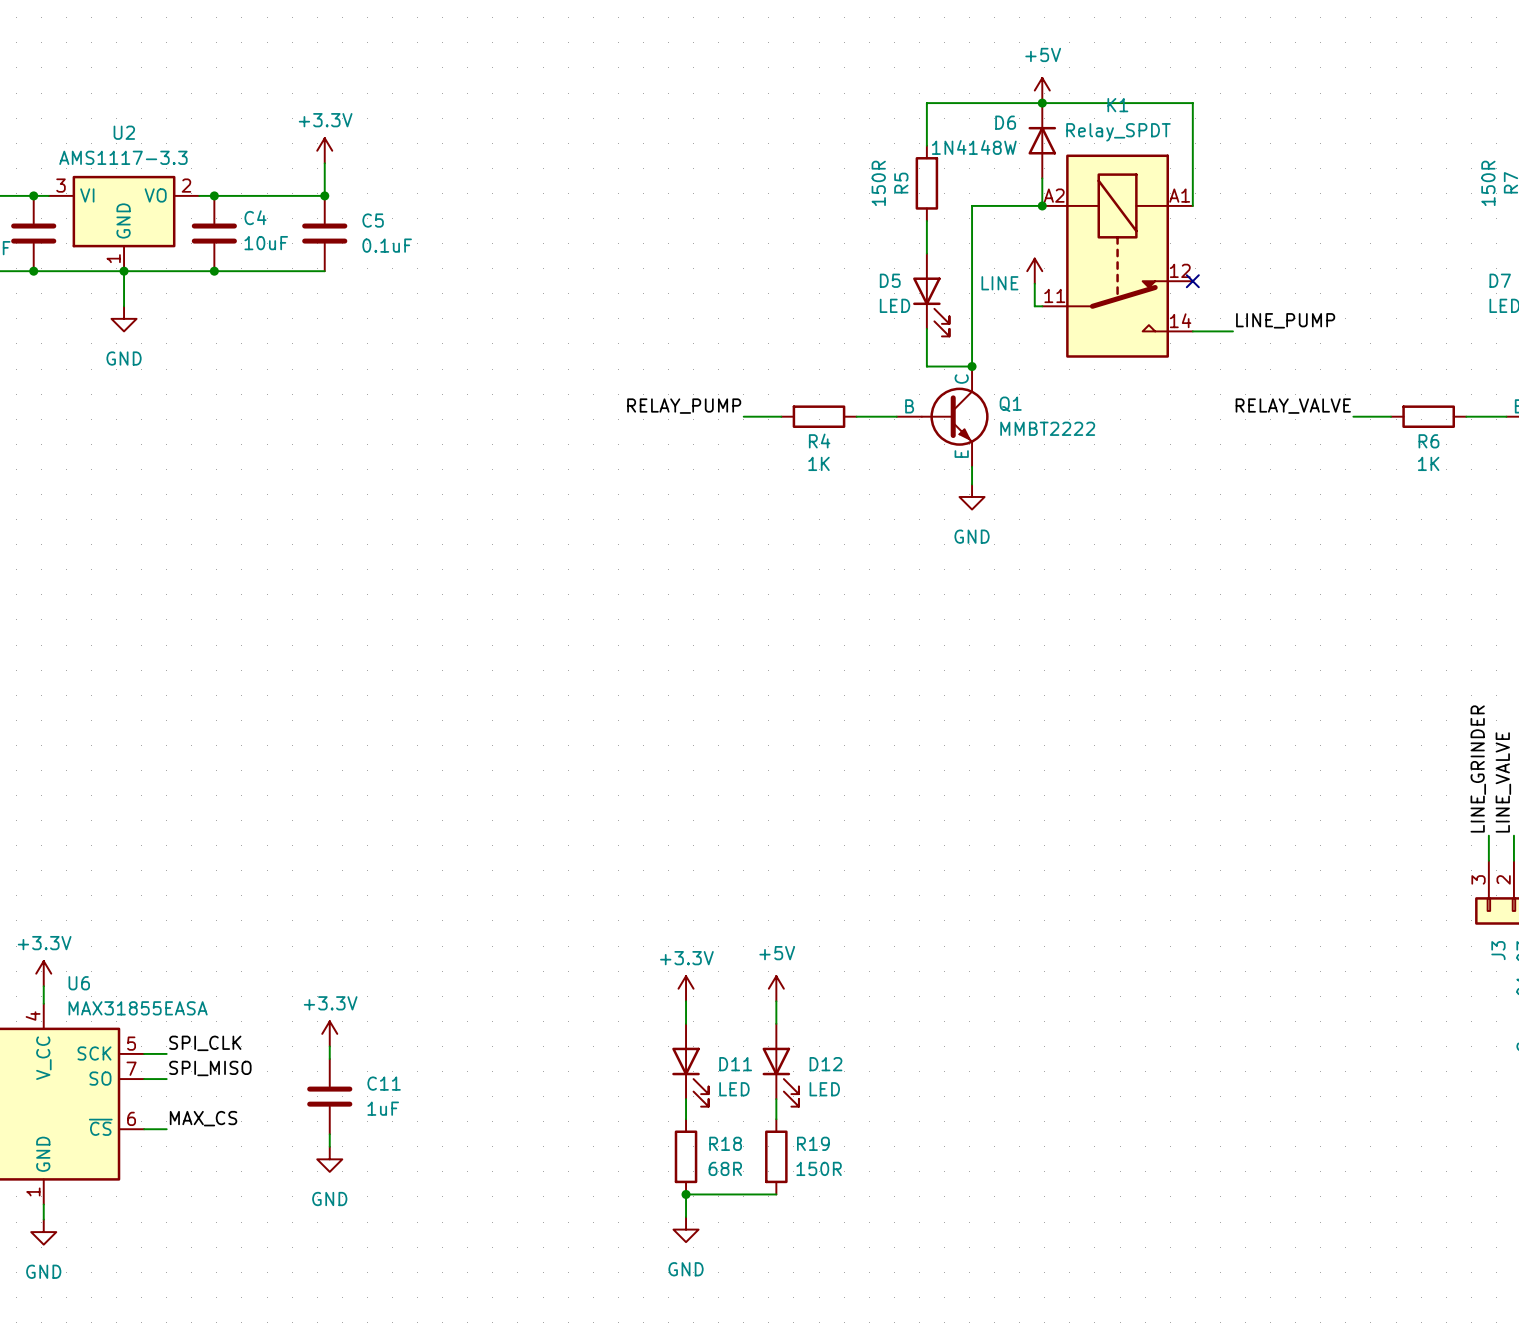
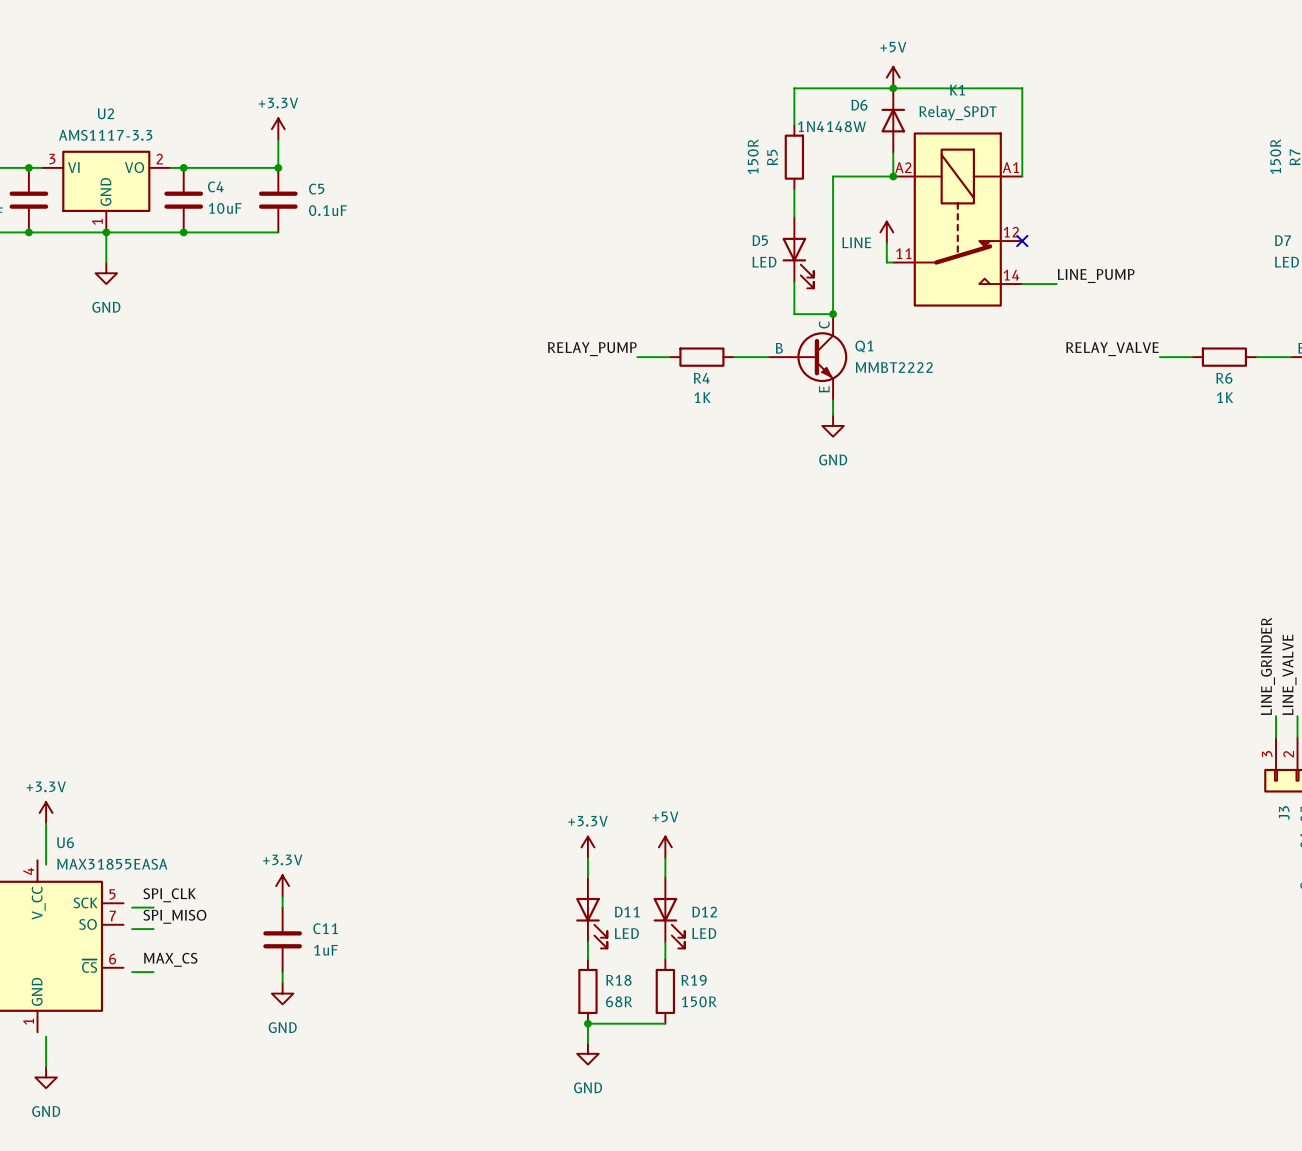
wire: none -> (46, 823) (46, 864)
power symbol position: +3.3V (43, 973) -> +3.3V (46, 812)
wire: (43, 986) (43, 1003) -> none
wire: (144, 1053) (166, 1053) -> none
wire: none -> (132, 907) (153, 907)
wire: (144, 1079) (166, 1079) -> none
wire: none -> (132, 929) (153, 929)
wire: (144, 1129) (166, 1129) -> none
wire: none -> (132, 972) (153, 972)
wire: (43, 1204) (43, 1219) -> none
wire: none -> (46, 1036) (46, 1066)
power symbol position: GND (43, 1232) -> GND (46, 1077)

